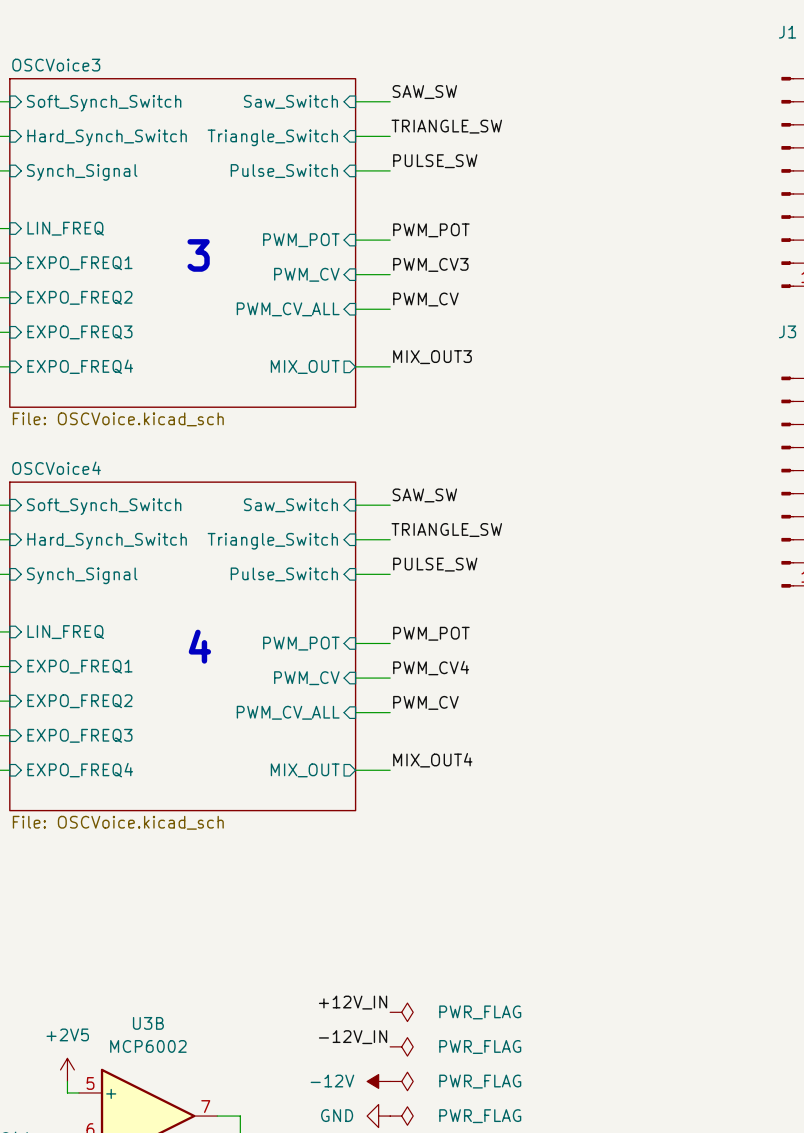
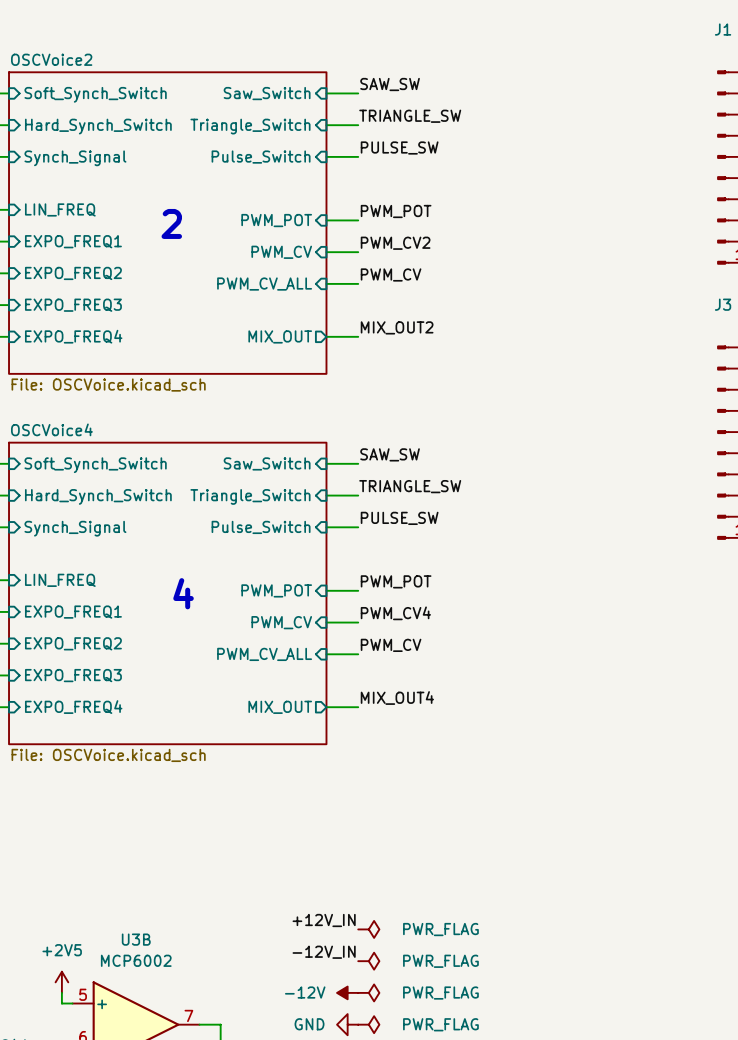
sheet OSCVoice3 name: OSCVoice3 (56, 65) -> OSCVoice2 (51, 59)
text: none -> 2 (171, 223)
text: 3 (198, 255) -> none
label: PWM_CV3 (430, 264) -> PWM_CV2 (395, 243)
label: MIX_OUT3 (432, 357) -> MIX_OUT2 (397, 327)

